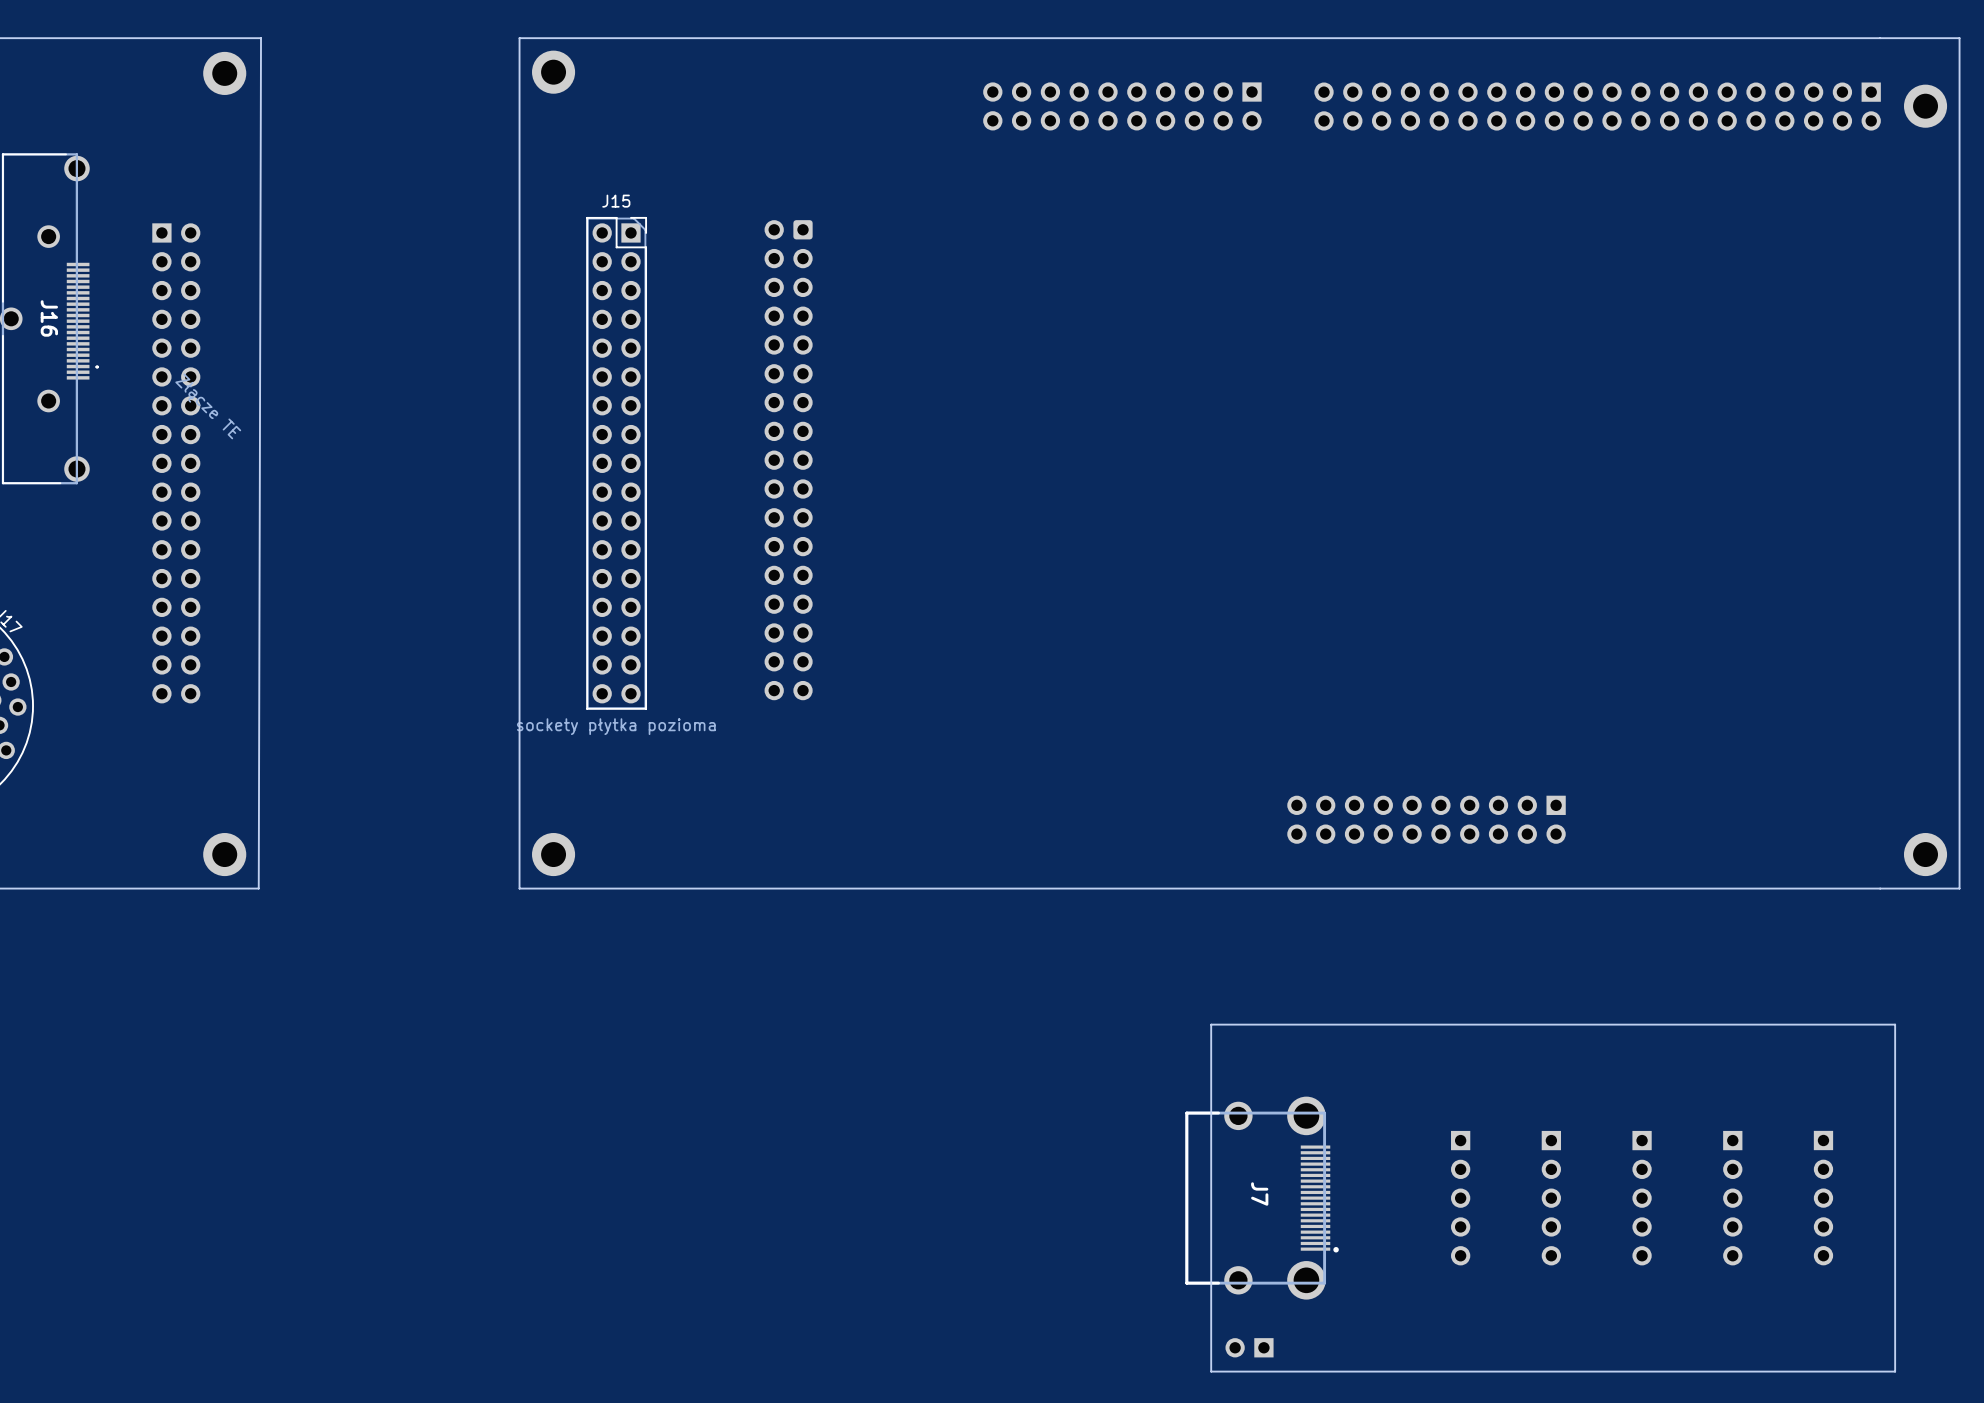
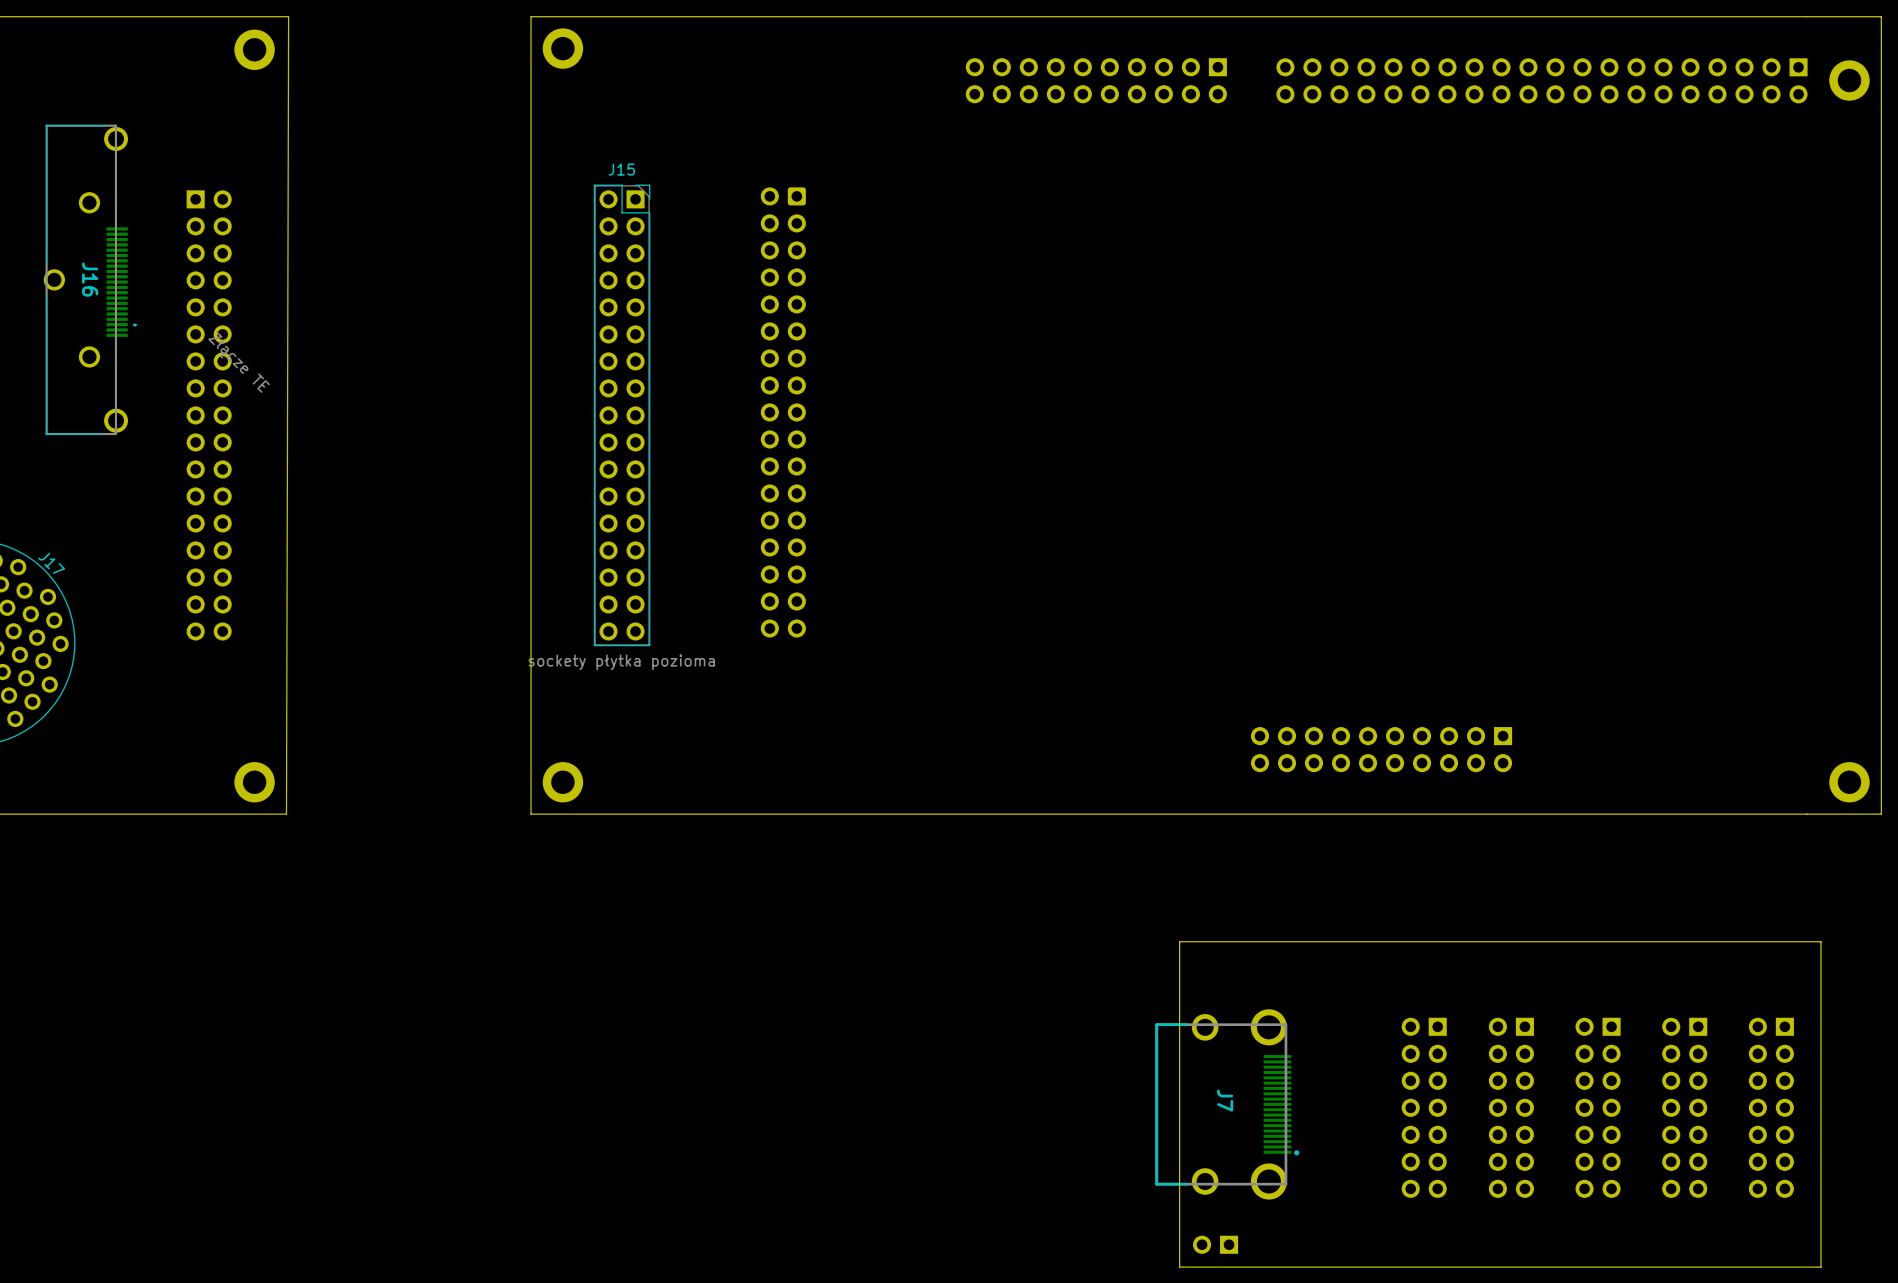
part: (1460, 1198) -> none
part: (1551, 1198) -> none
part: (1642, 1198) -> none
part: (1732, 1198) -> none
part: (1823, 1198) -> none
part: none -> (1424, 1107)
part: none -> (1511, 1107)
part: none -> (1598, 1107)
part: none -> (1684, 1107)
part: none -> (1771, 1107)

